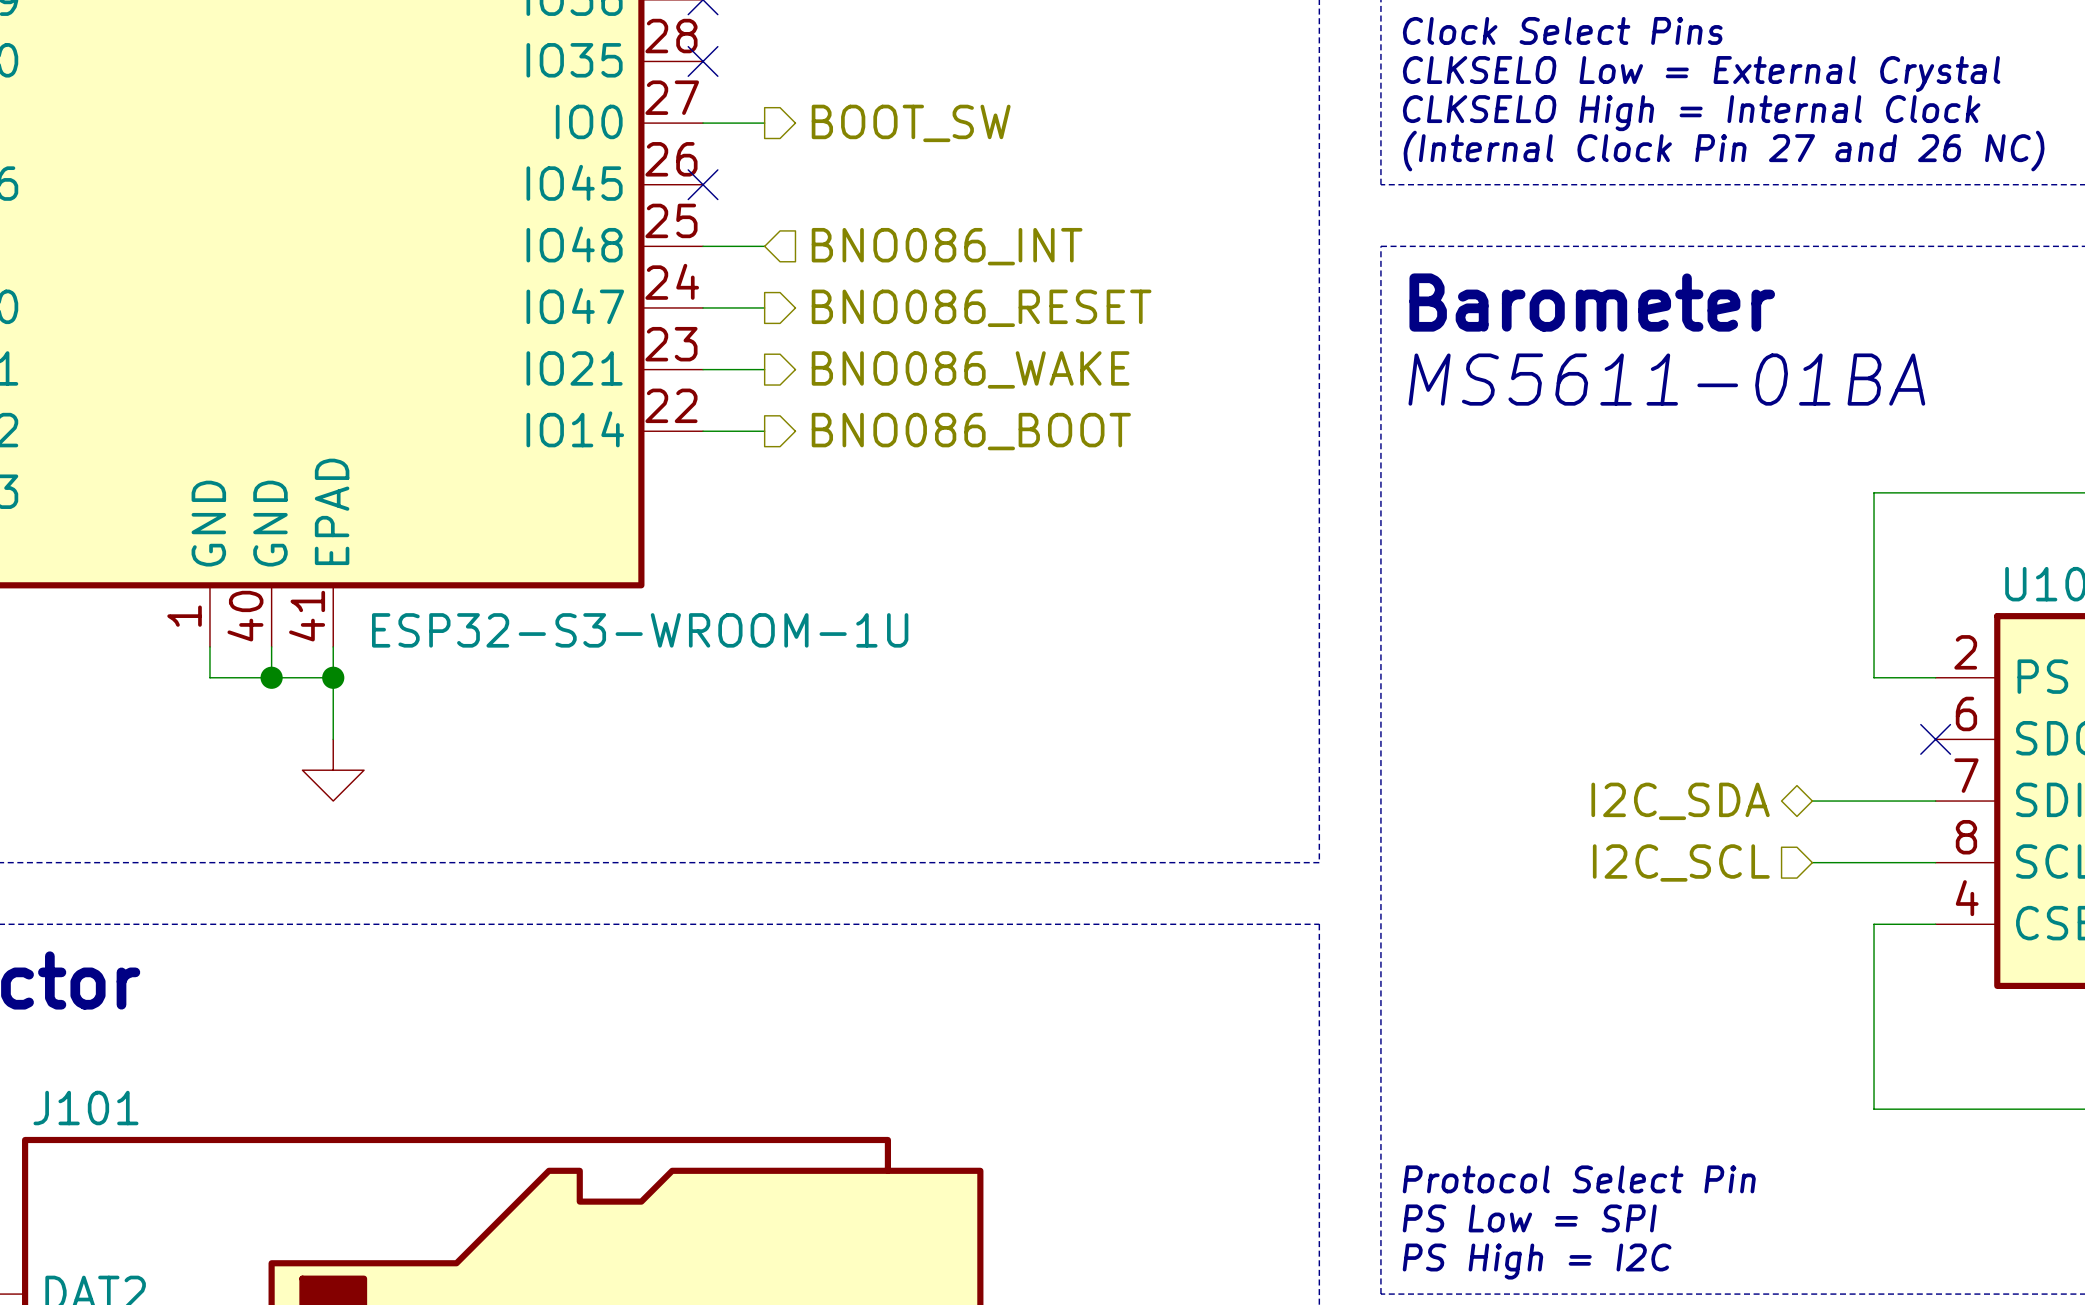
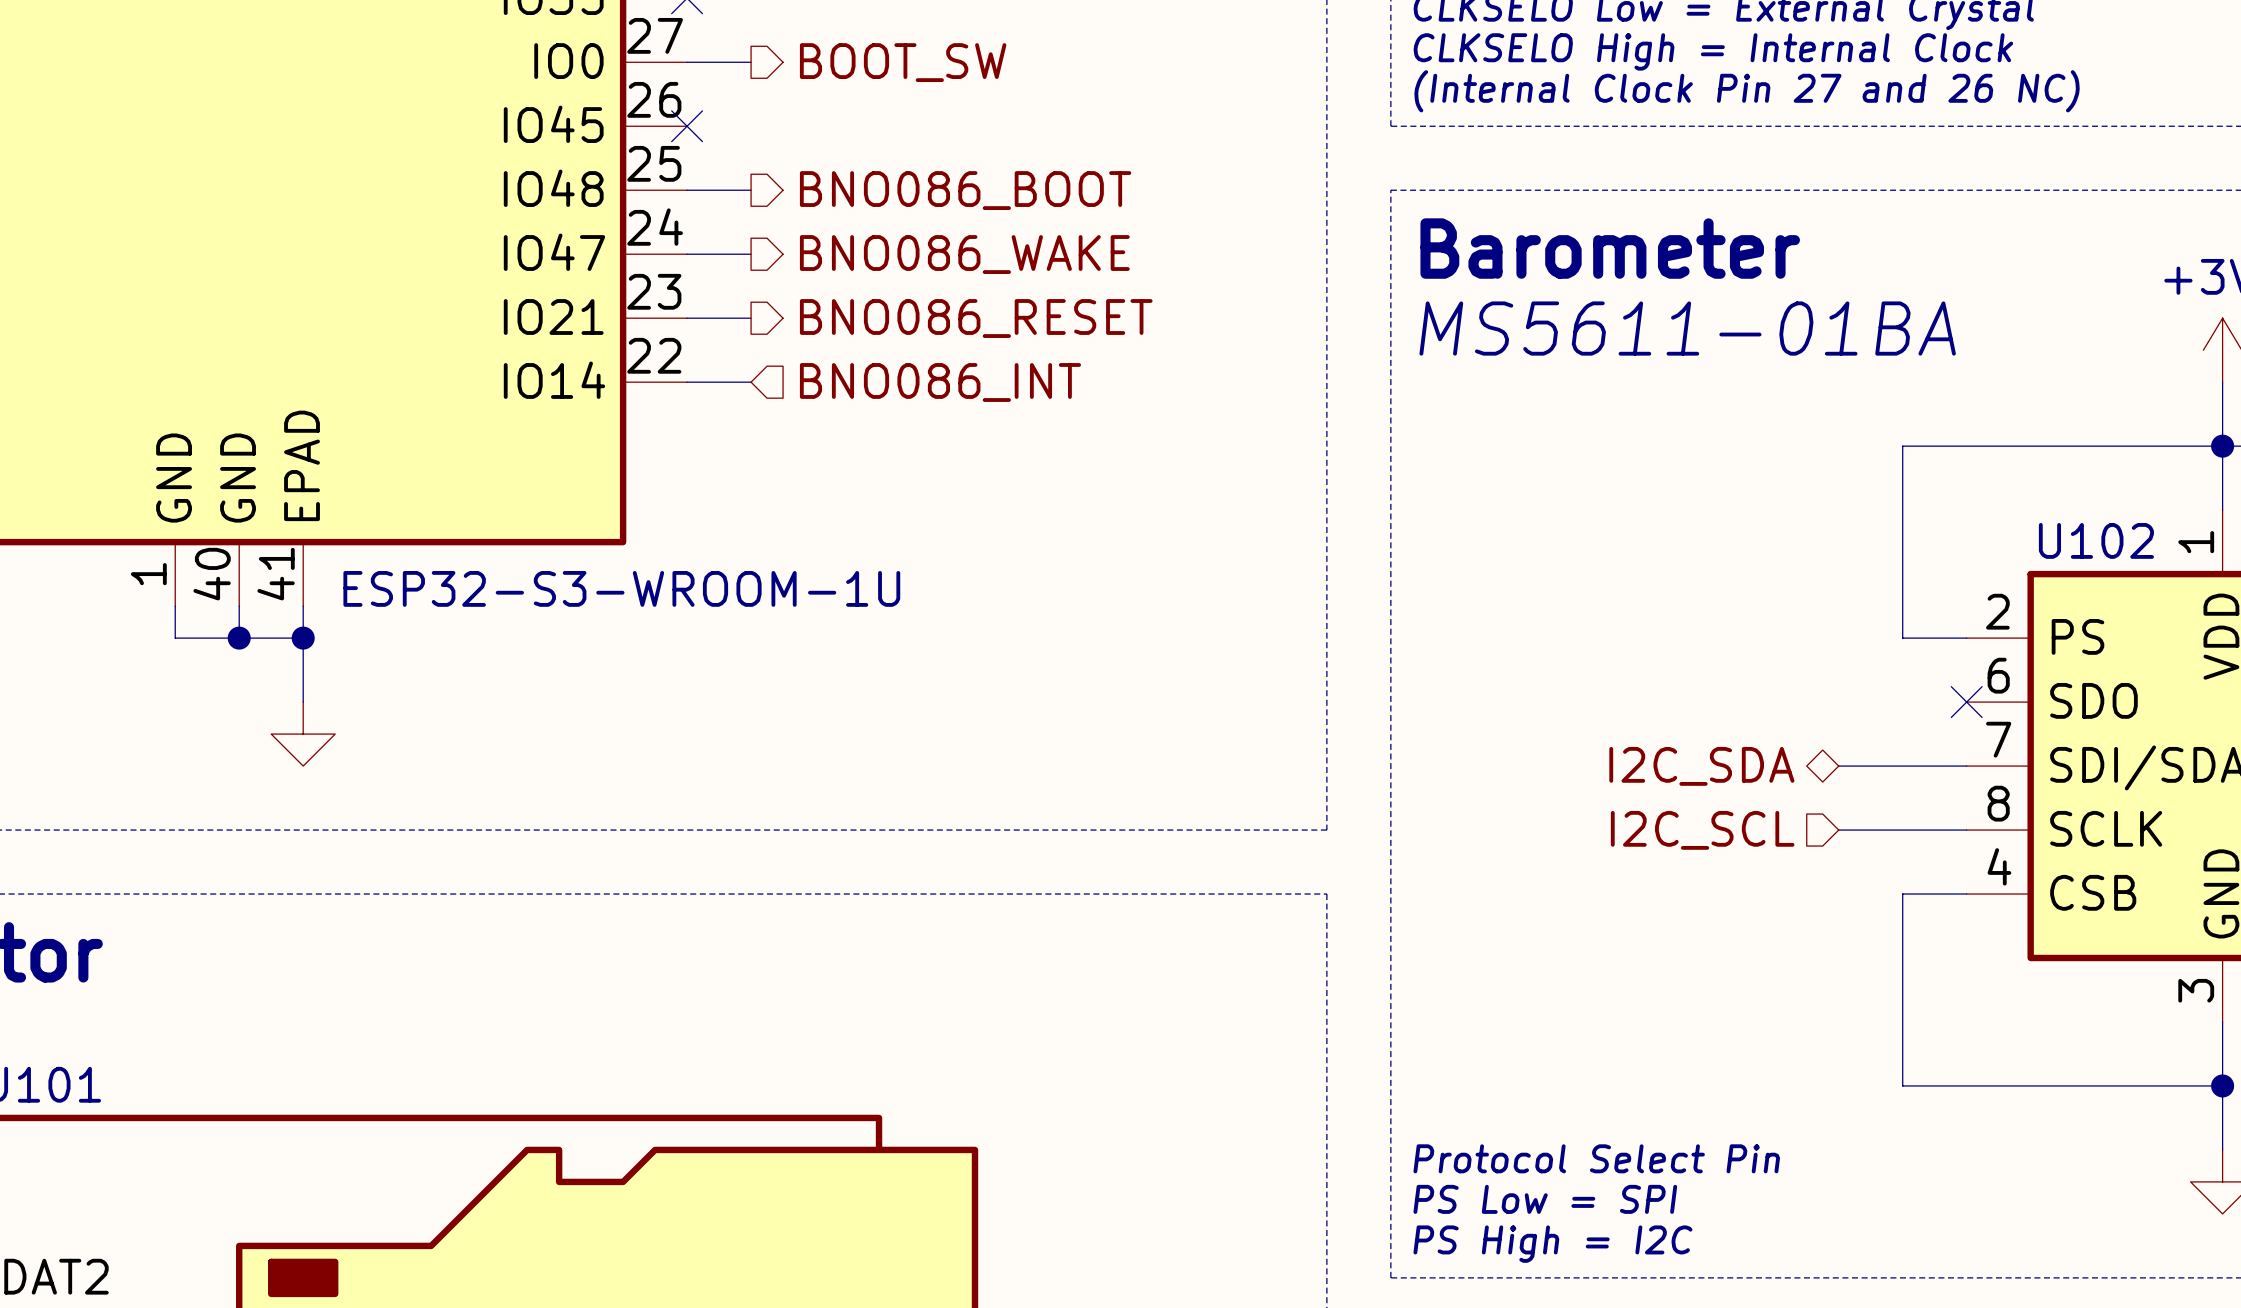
hierarchical label shape: input (947, 246) -> output (965, 190)
hierarchical label: BNO086_INT (947, 246) -> BNO086_BOOT (965, 190)
hierarchical label: BNO086_RESET (981, 308) -> BNO086_WAKE (964, 254)
hierarchical label: BNO086_WAKE (970, 369) -> BNO086_RESET (976, 318)
hierarchical label shape: output (971, 431) -> input (940, 382)
hierarchical label: BNO086_BOOT (971, 431) -> BNO086_INT (940, 382)

